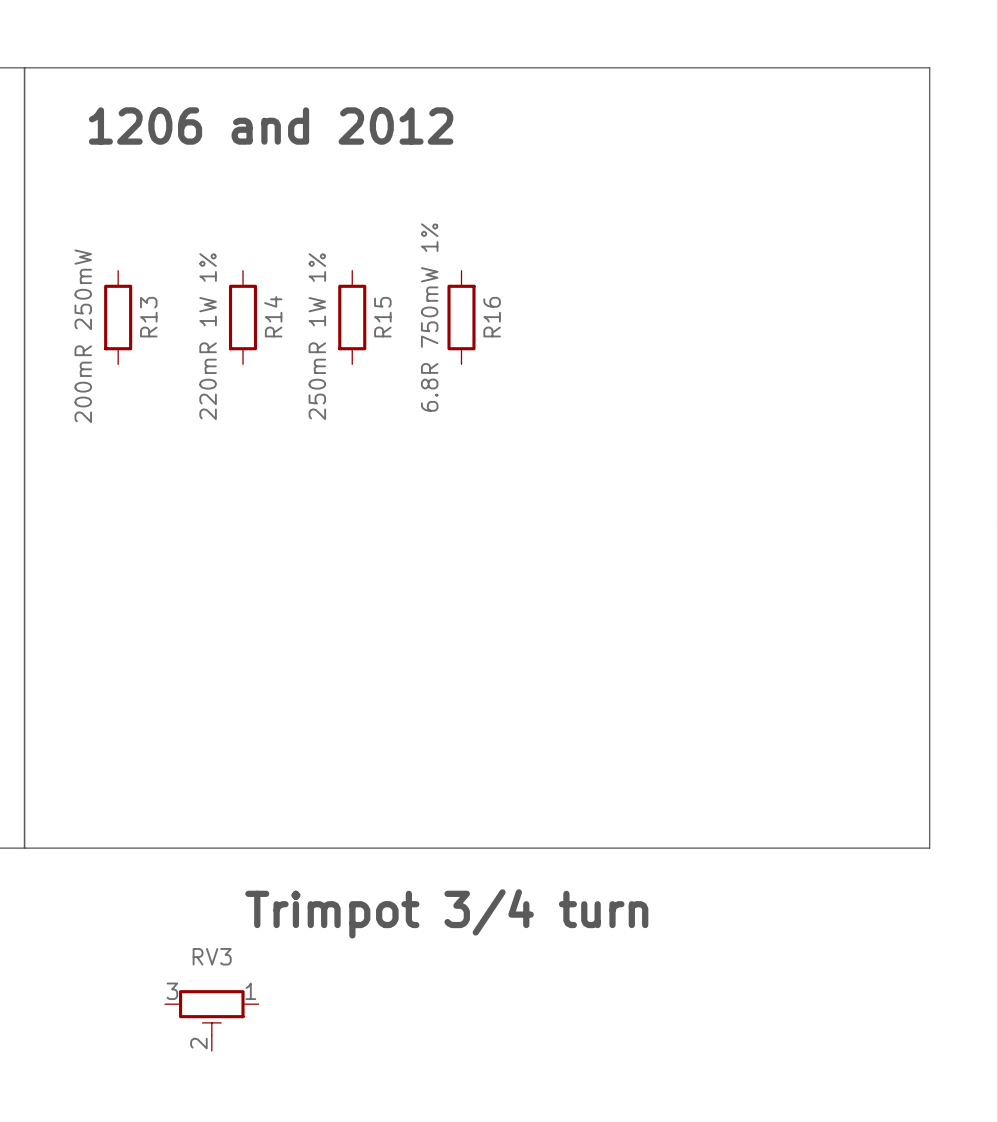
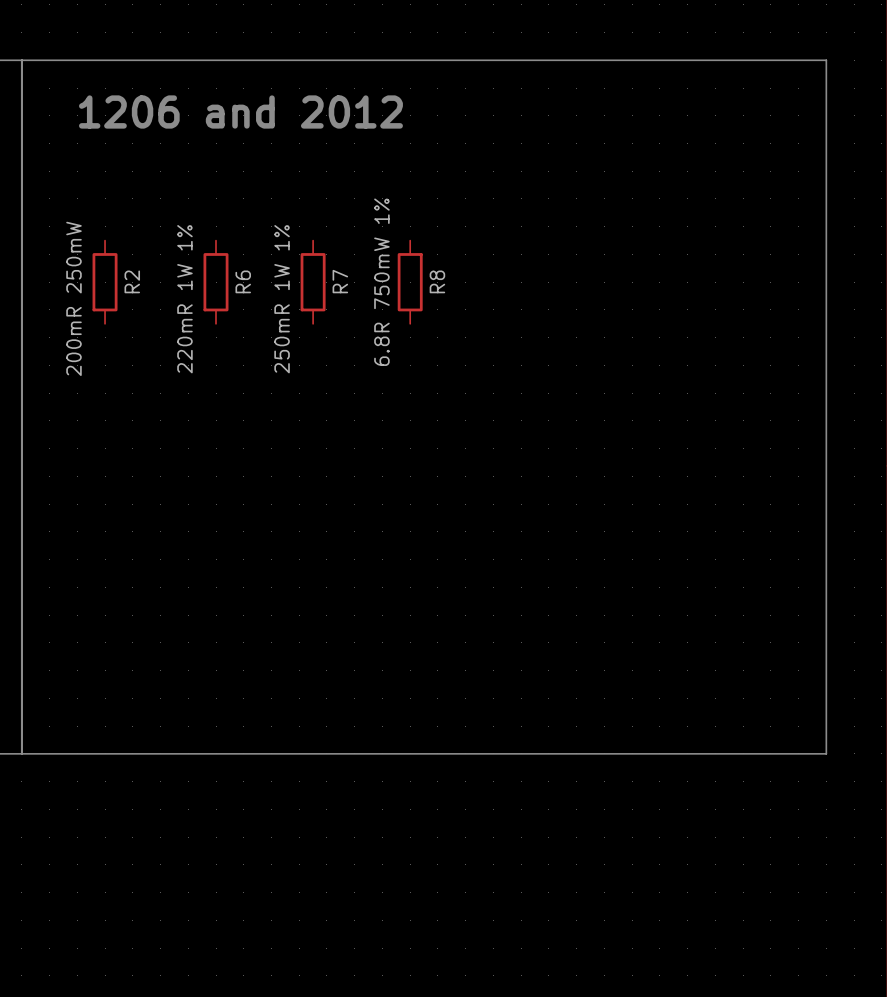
R14 name: R14 (273, 316) -> R6 (243, 281)
R13 name: R13 (148, 317) -> R2 (132, 281)
R15 name: R15 (382, 317) -> R7 (340, 281)
R16 name: R16 (492, 317) -> R8 (437, 281)
text: Trimpot 3/4 turn (446, 913) -> none
RV3: (211, 1020) -> none

